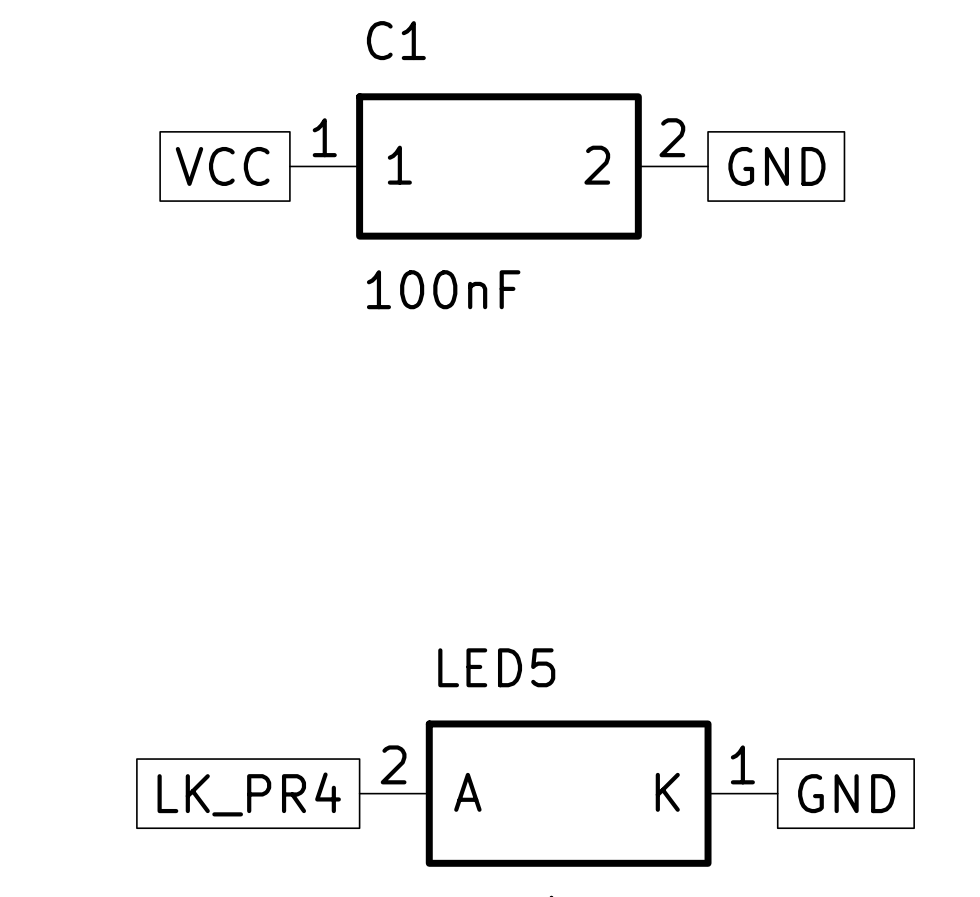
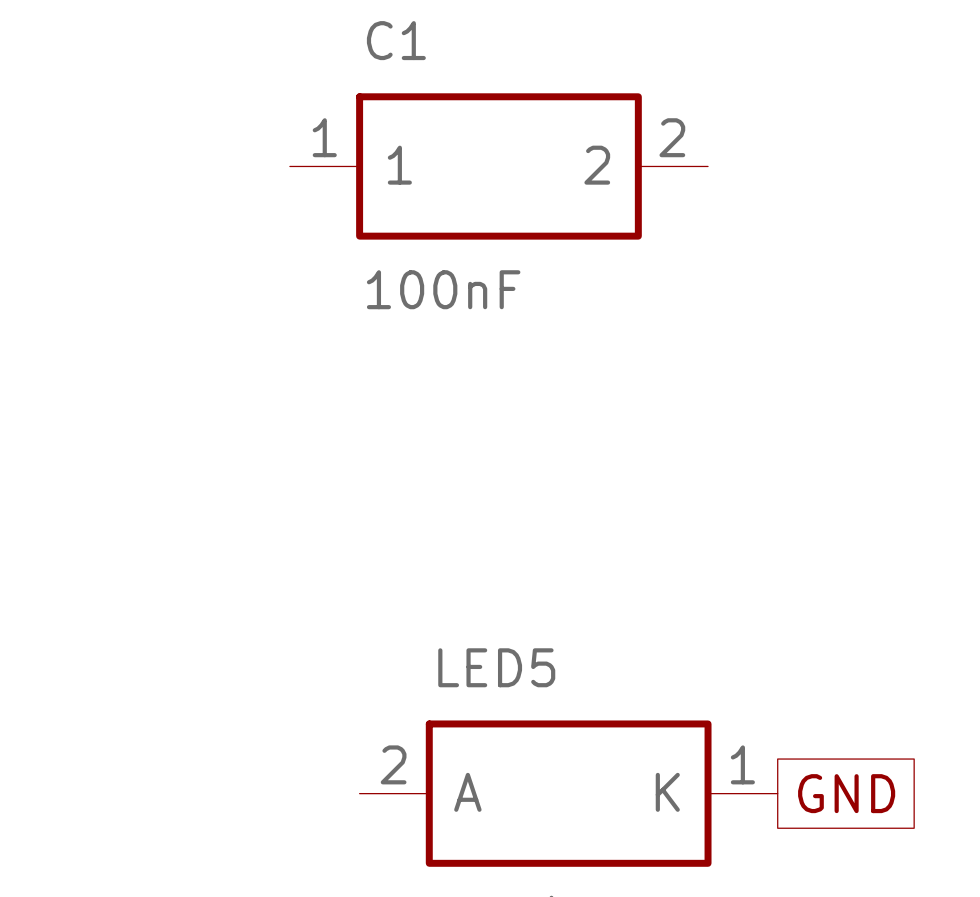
global label: VCC (222, 166) -> none
global label: GND (776, 166) -> none
global label: LK_PR4 (249, 794) -> none

